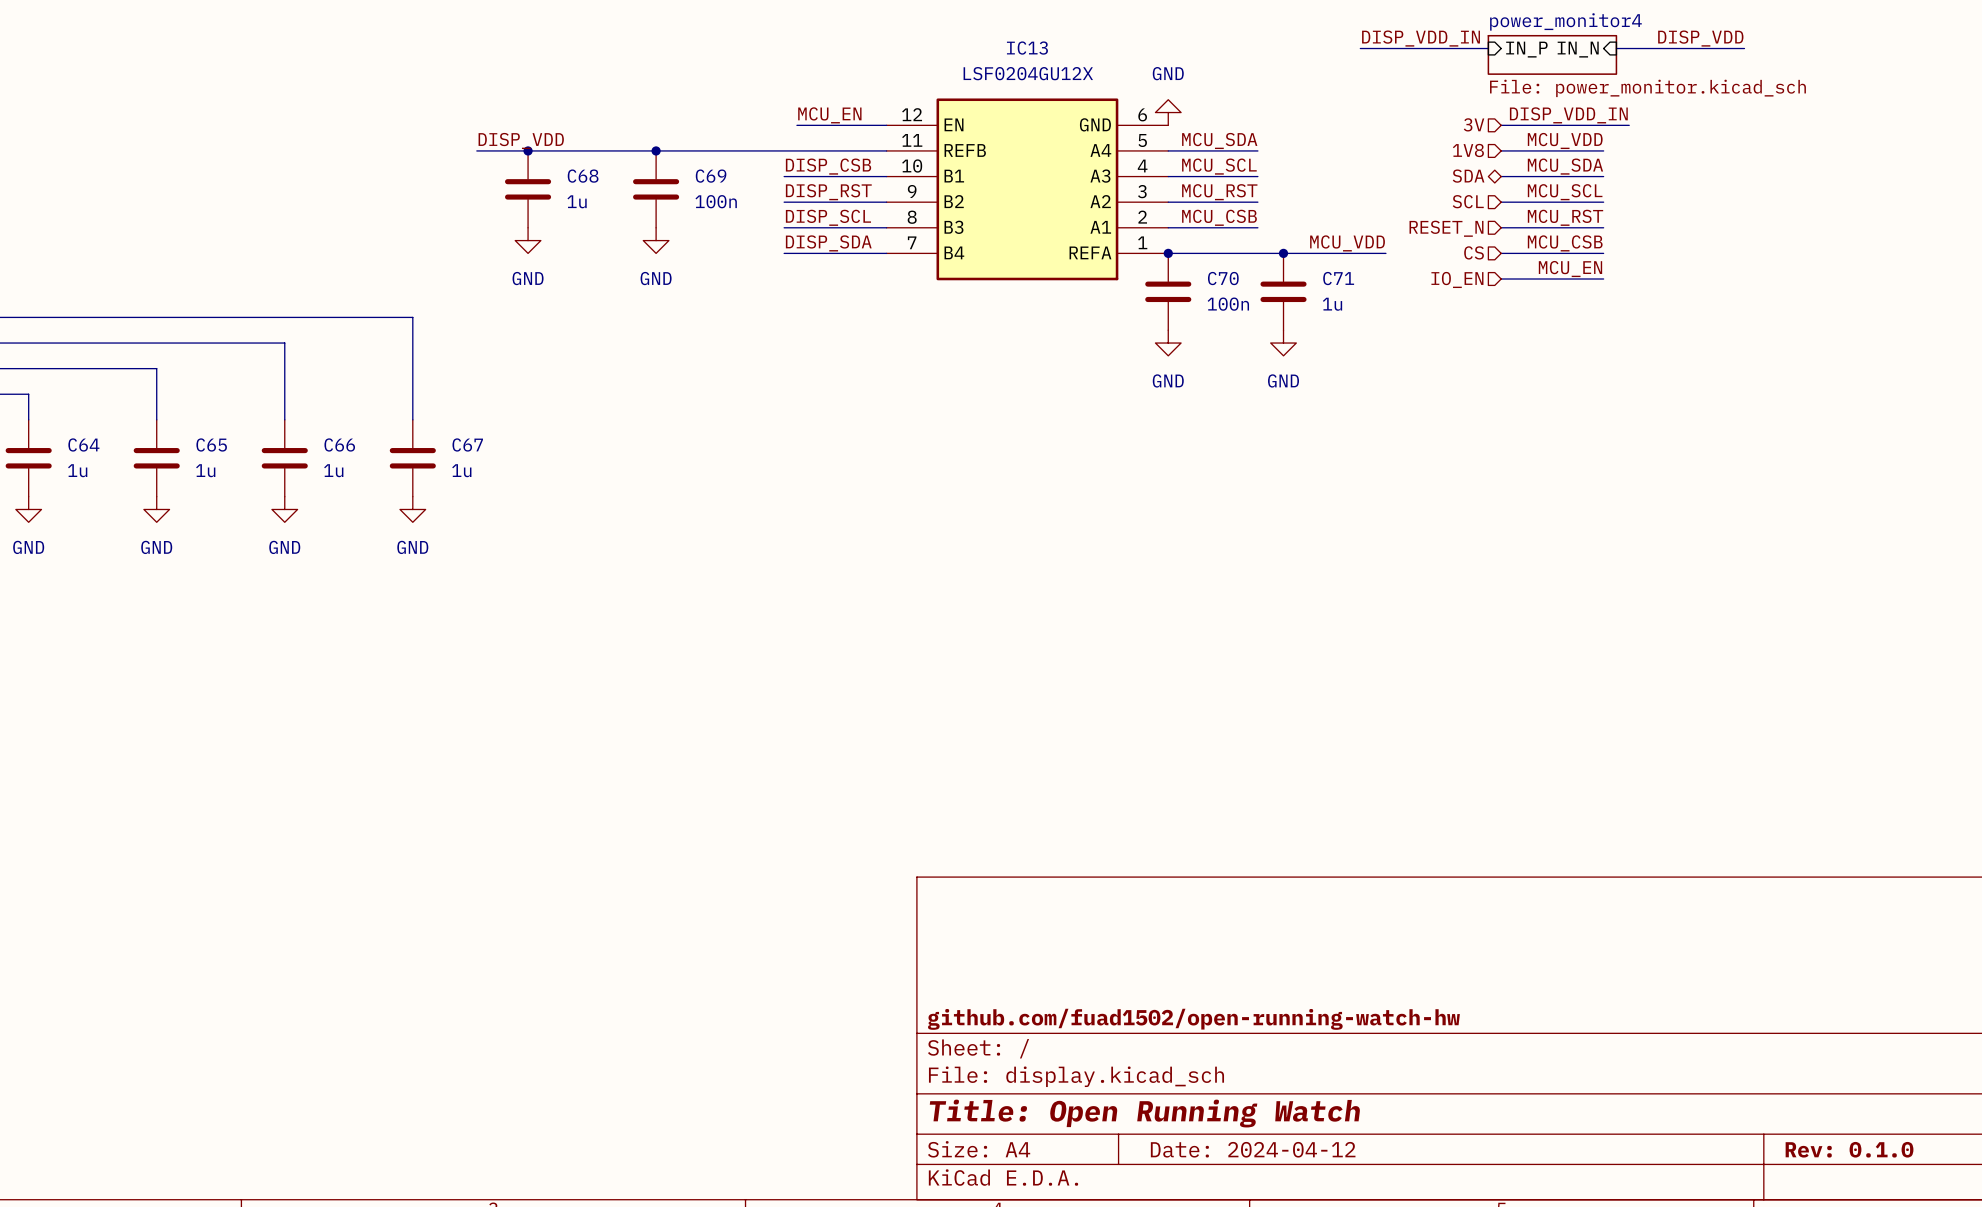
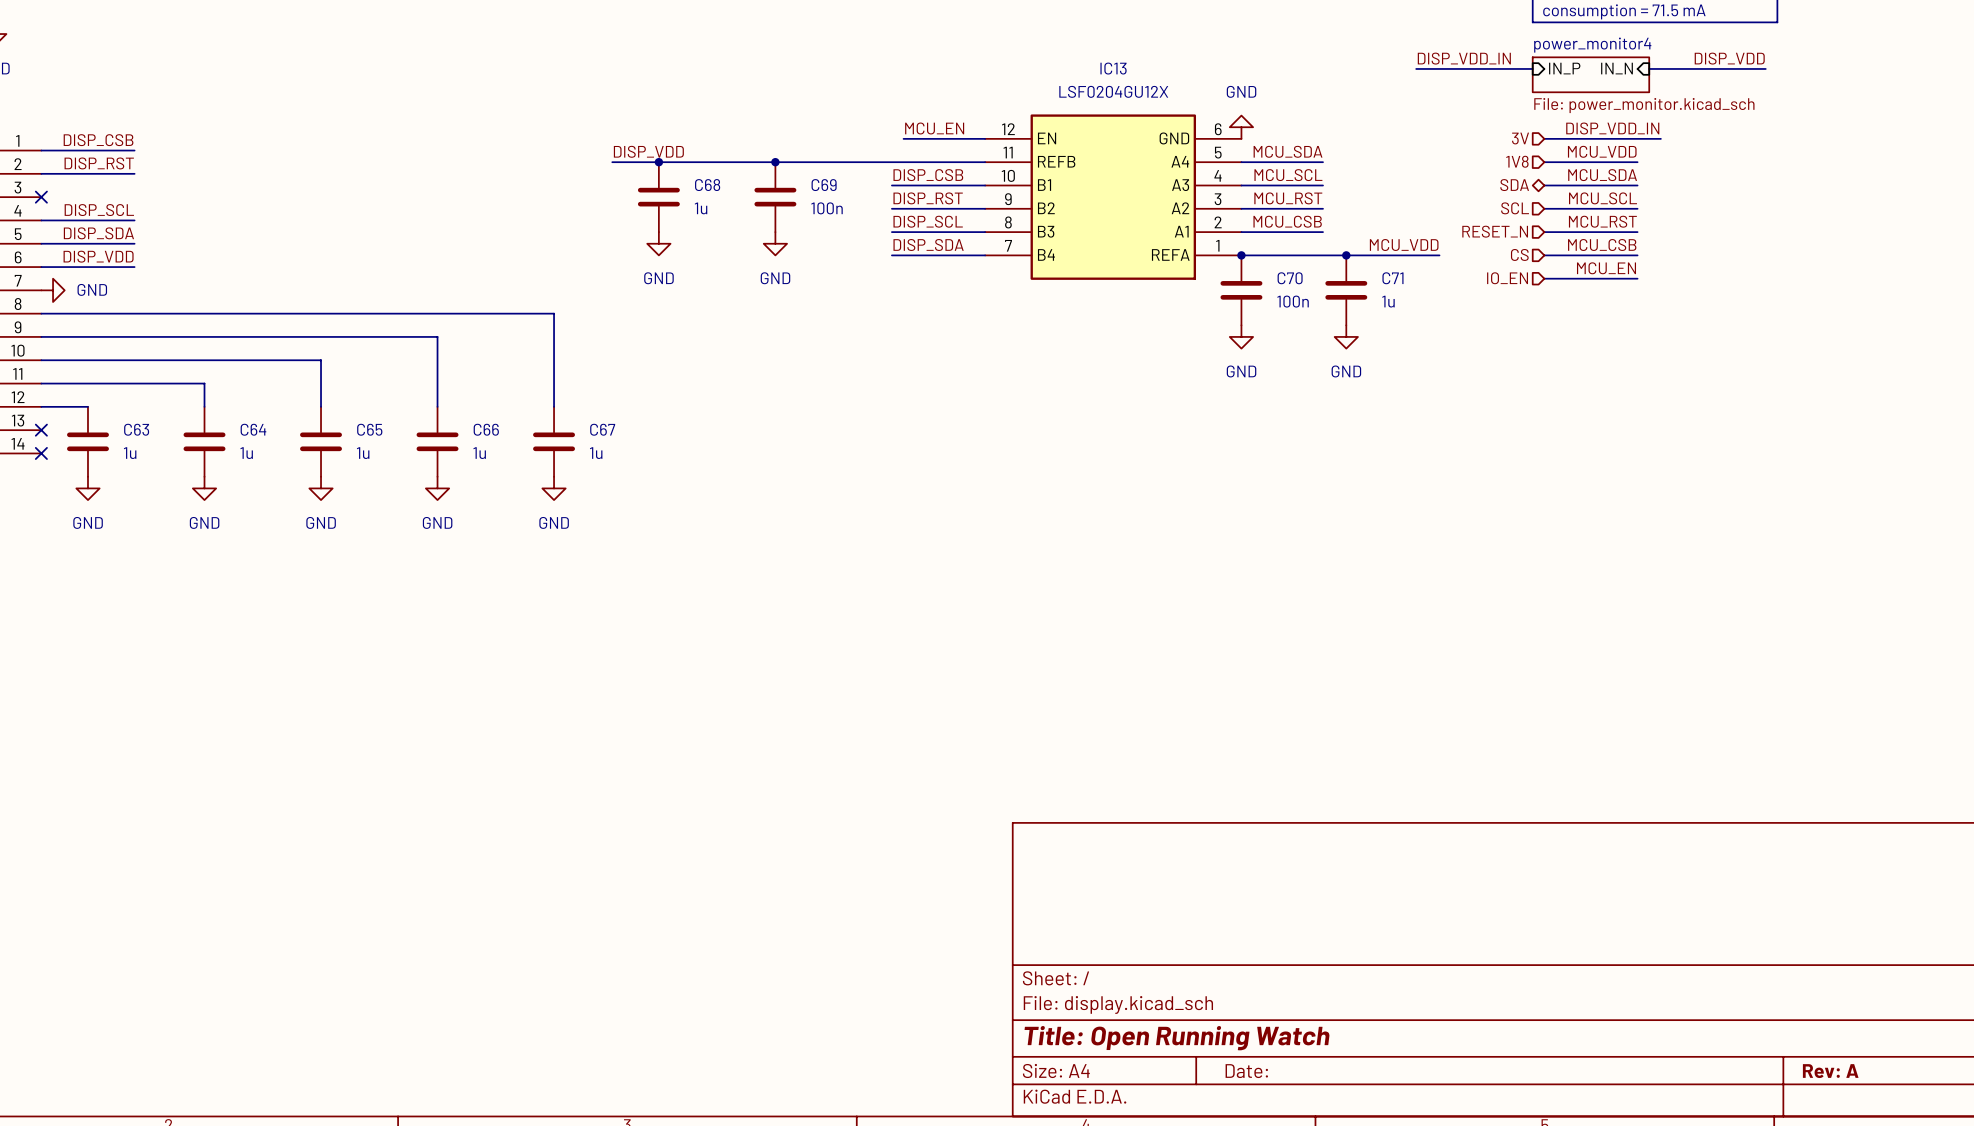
title block: github.com/fuad1502/open-running-watch-hw (1193, 1019) -> none
title block: Date: 2024-04-12 (1253, 1149) -> Date: (1246, 1071)
title block: Rev: 0.1.0 (1849, 1149) -> Rev: A (1830, 1071)

